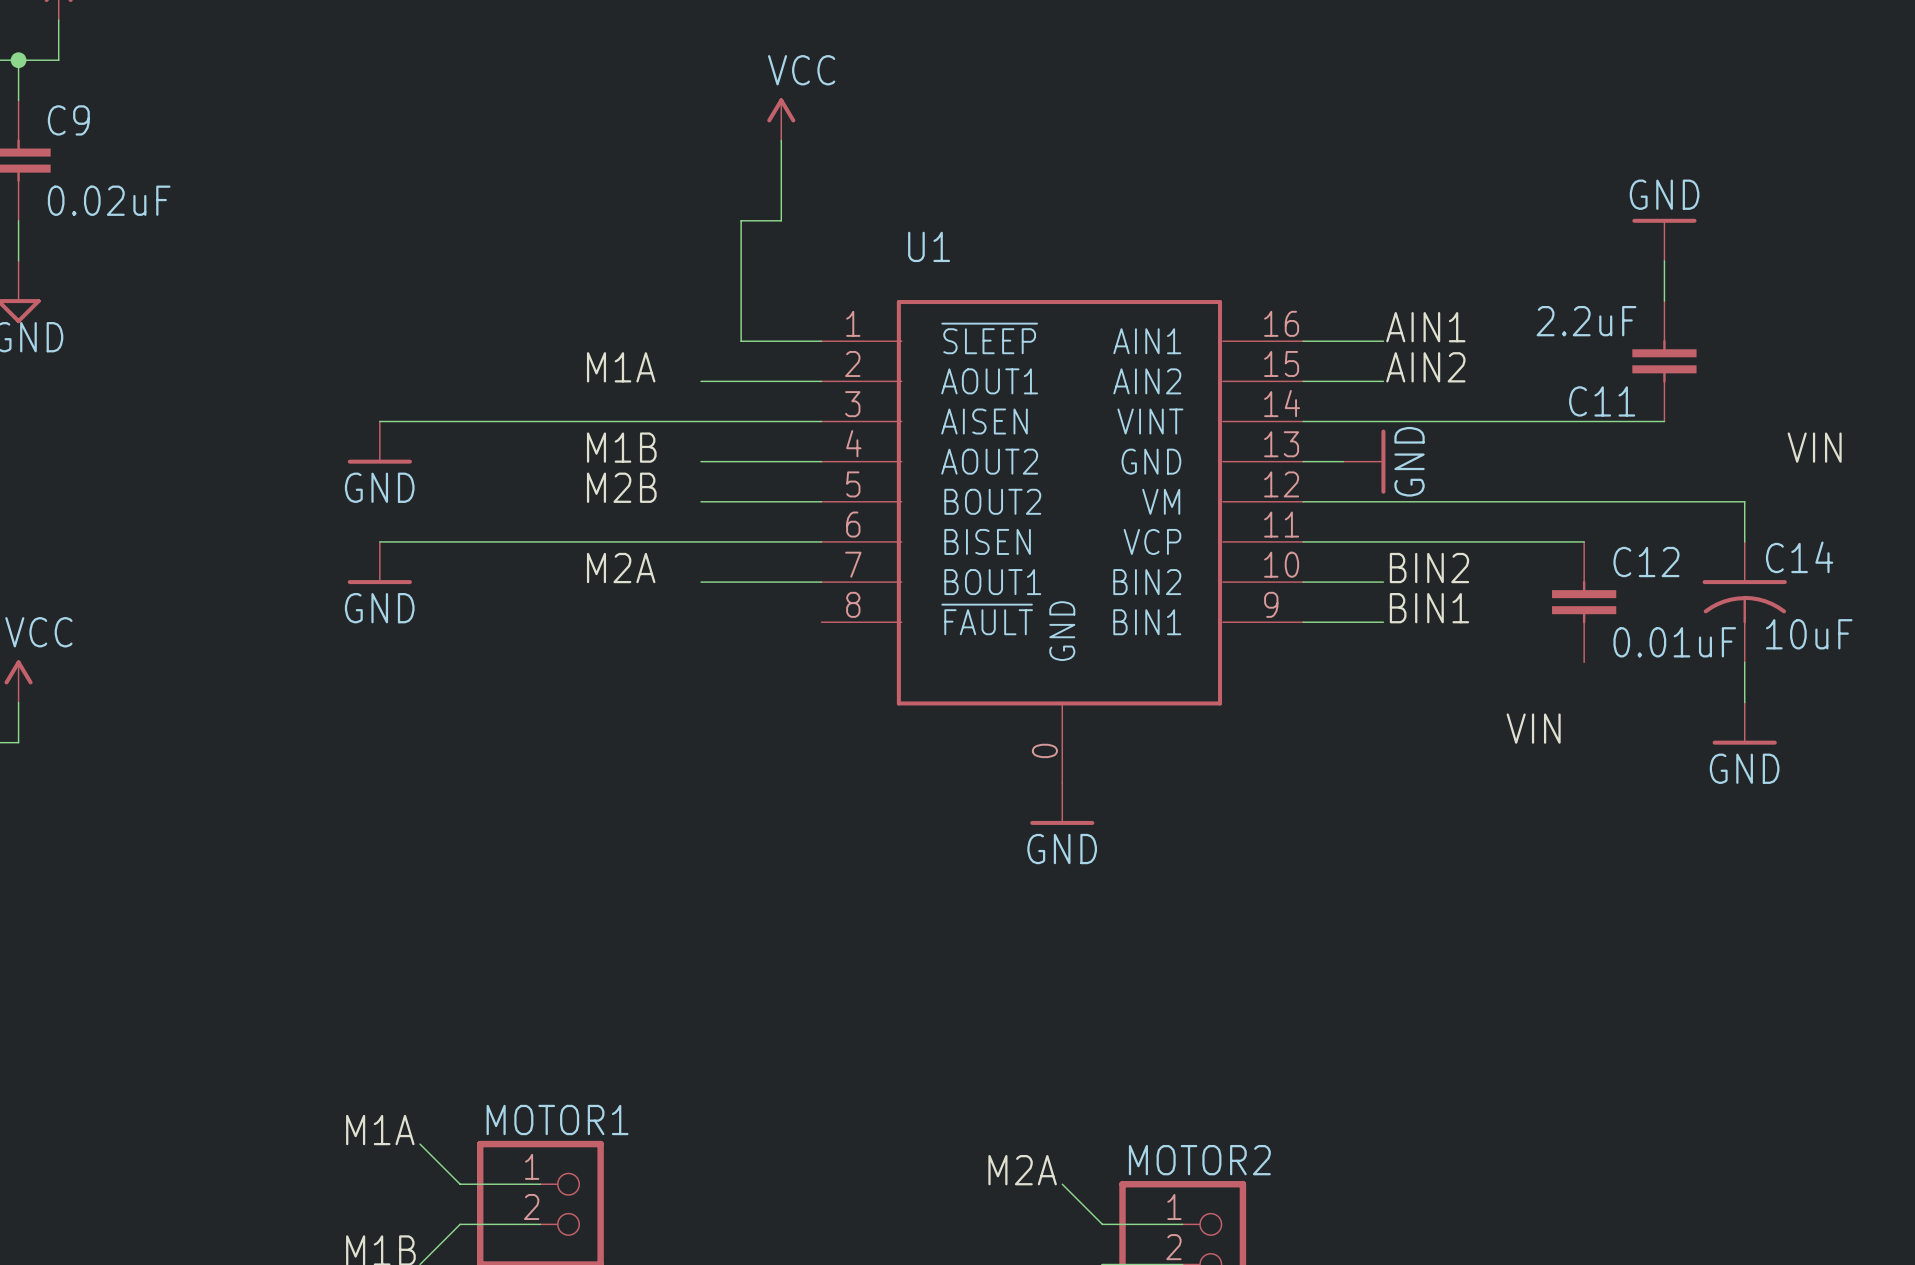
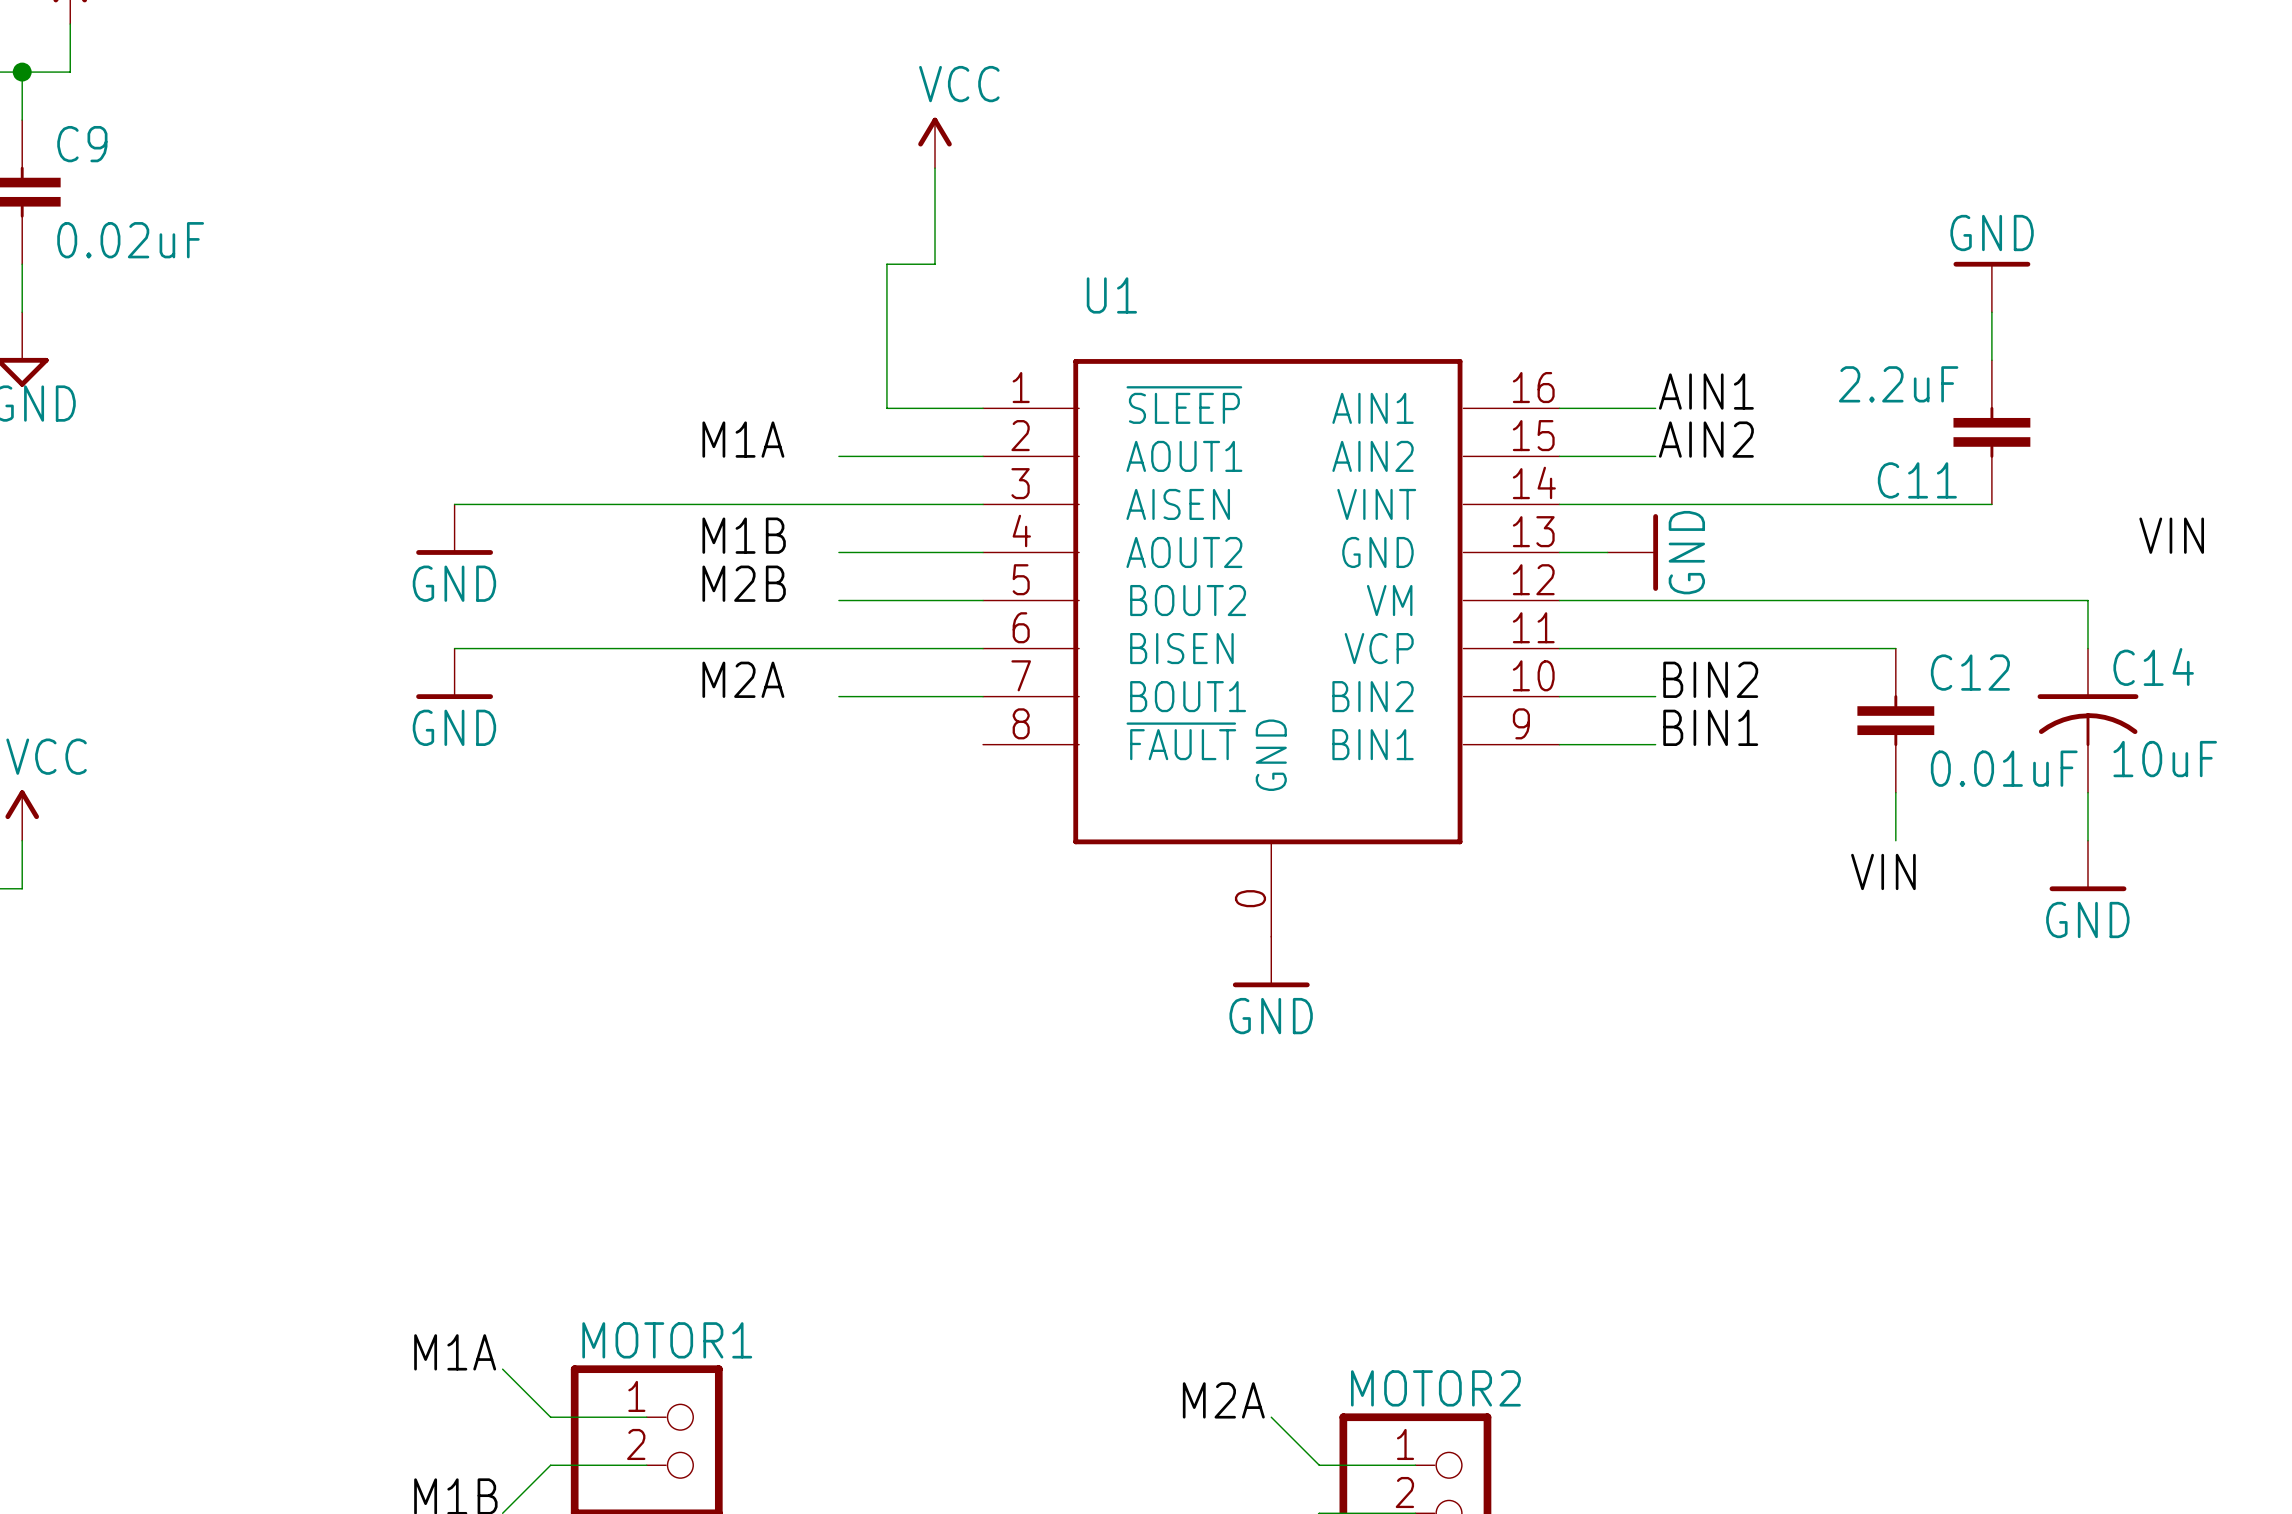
wire: none -> (1895, 792) (1895, 840)
label position: VIN (1533, 728) -> VIN (1883, 871)

